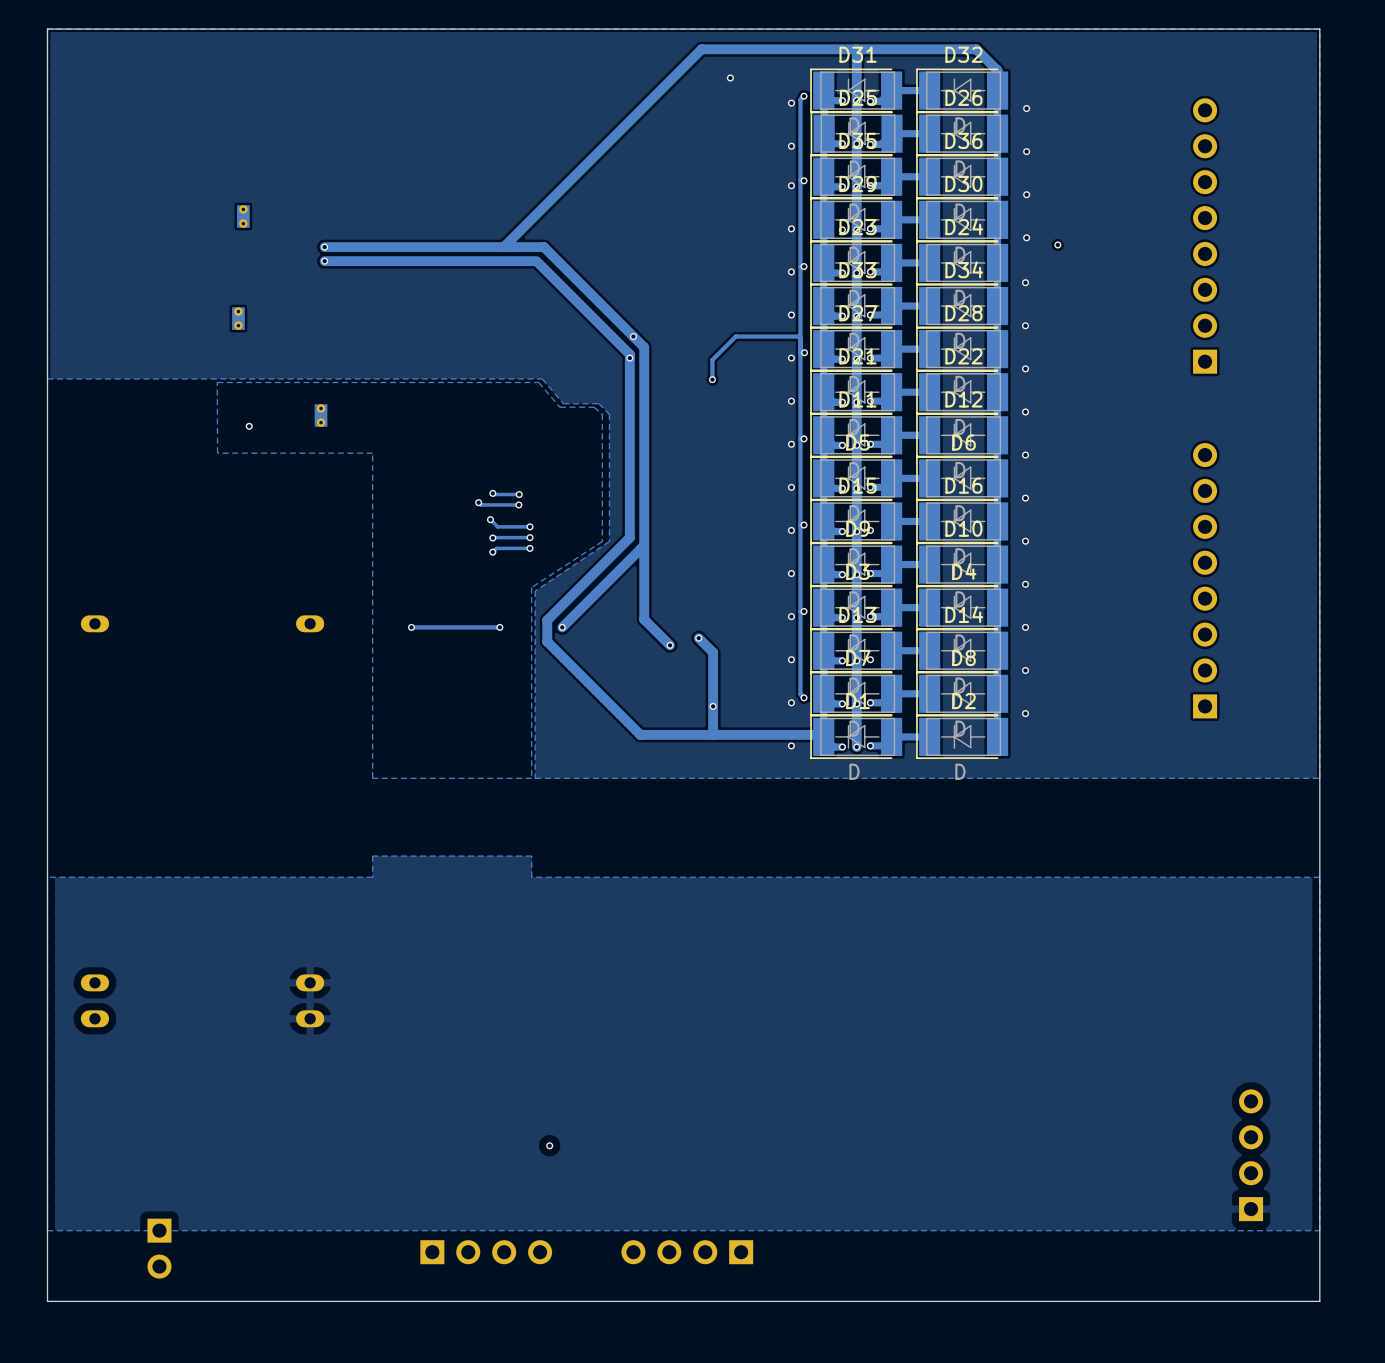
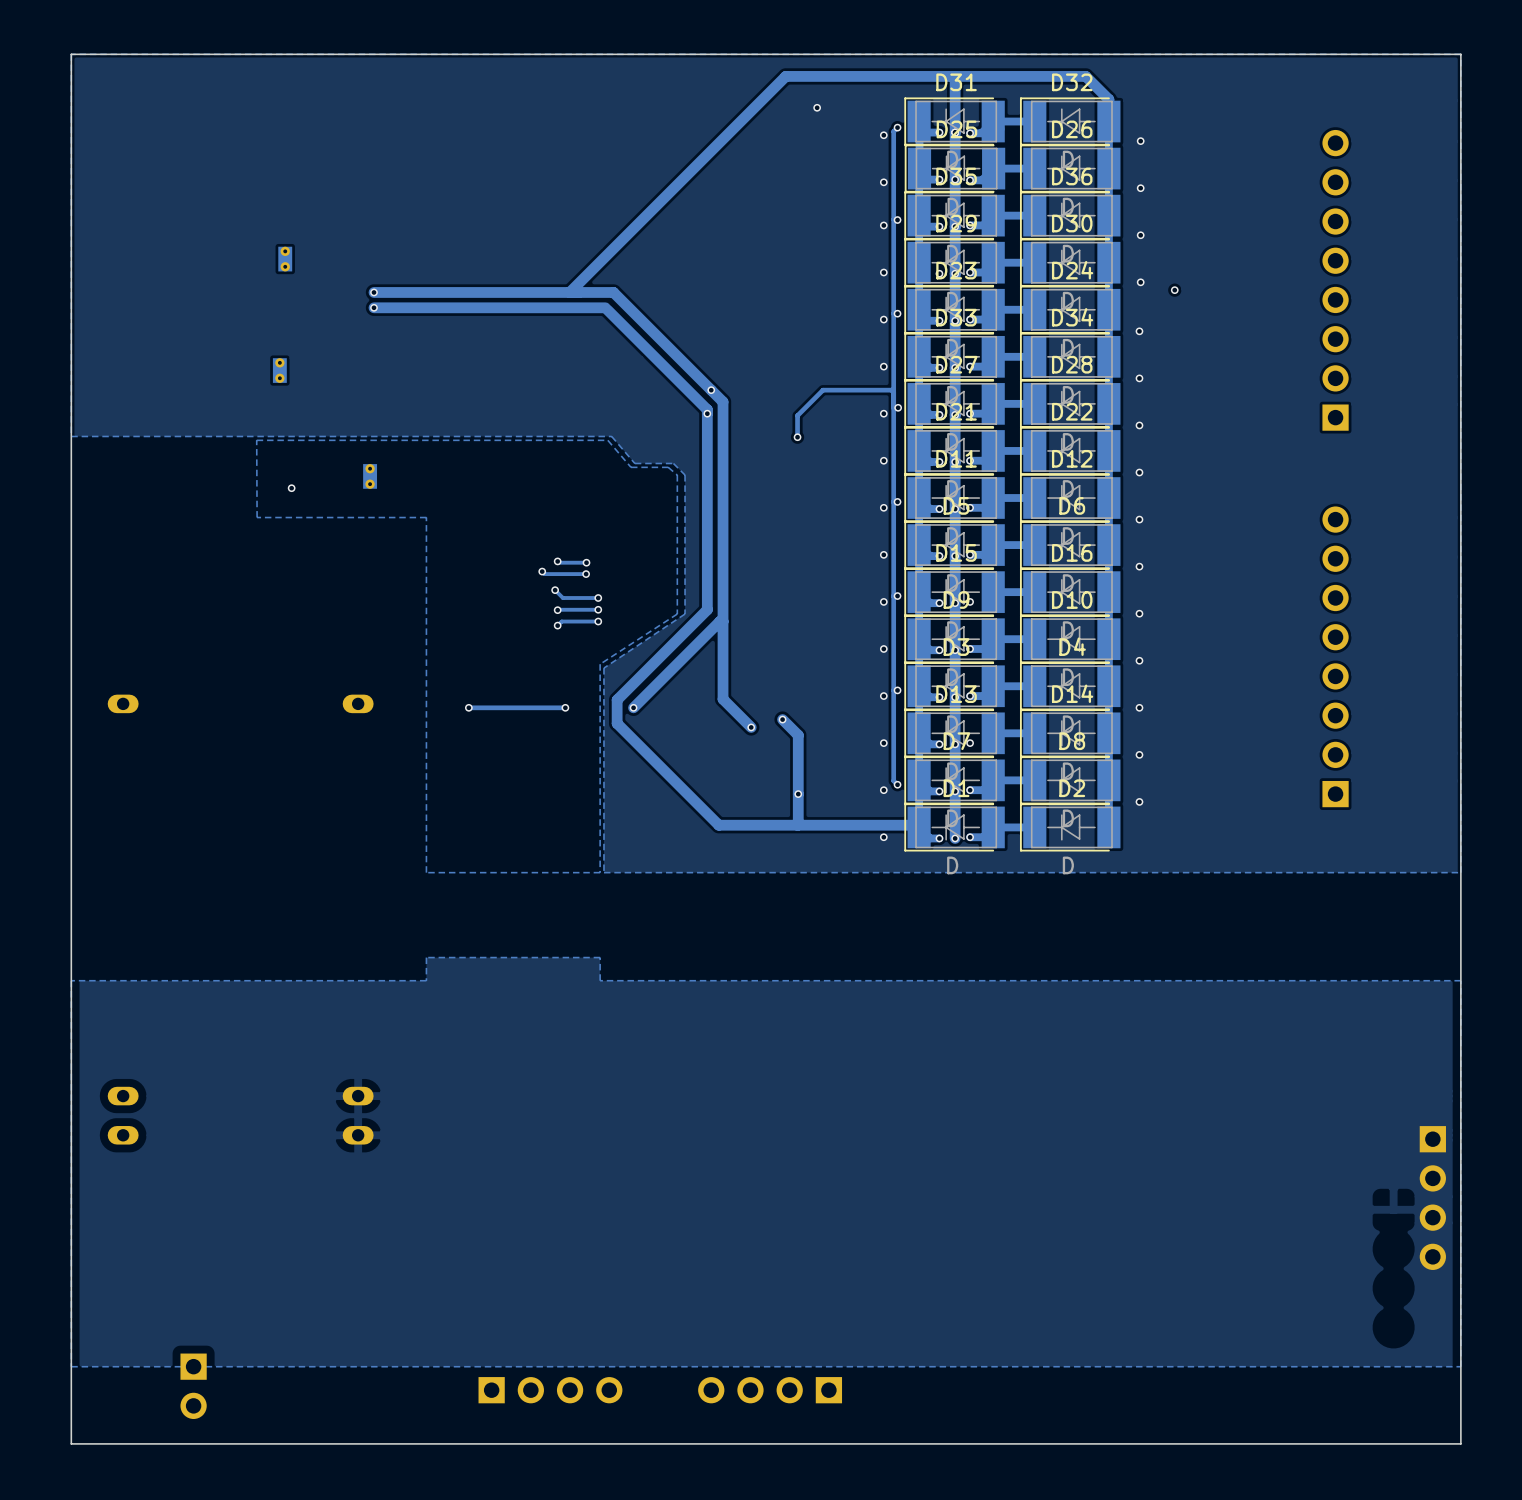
via: (549, 1145) -> none
part rotation: 0° (1251, 1155) -> 180° (1432, 1198)
part position: (1251, 1155) -> (1432, 1198)

